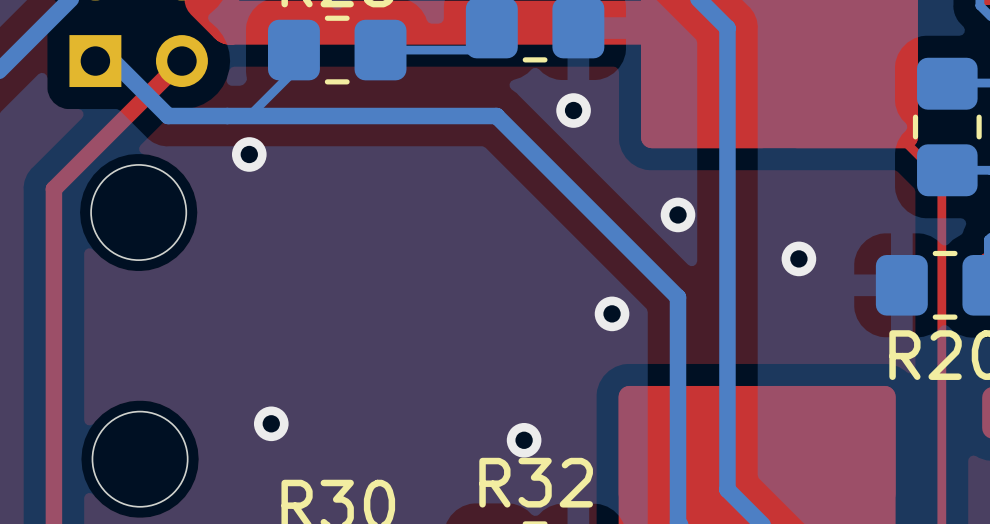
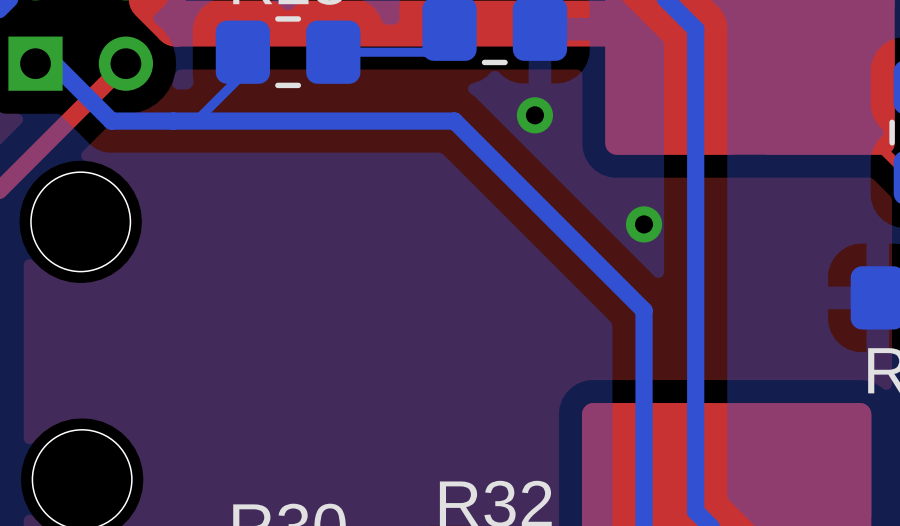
via: (249, 154) -> none
via: (798, 258) -> none
via: (612, 313) -> none
via: (271, 423) -> none
via: (524, 440) -> none

